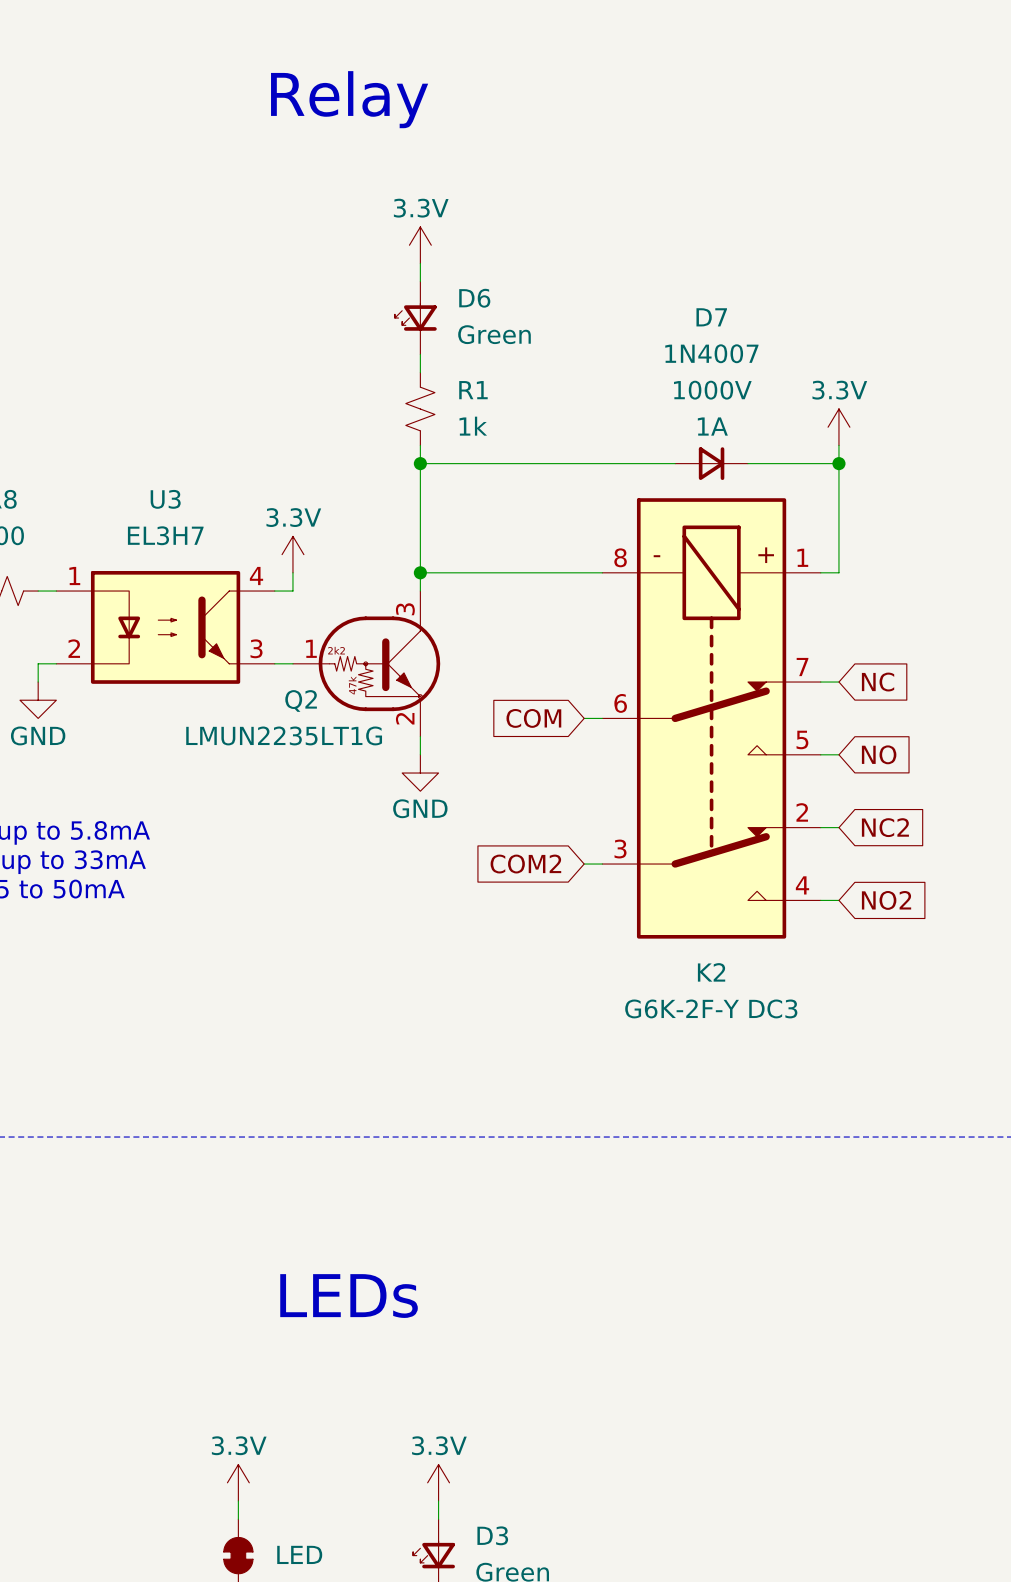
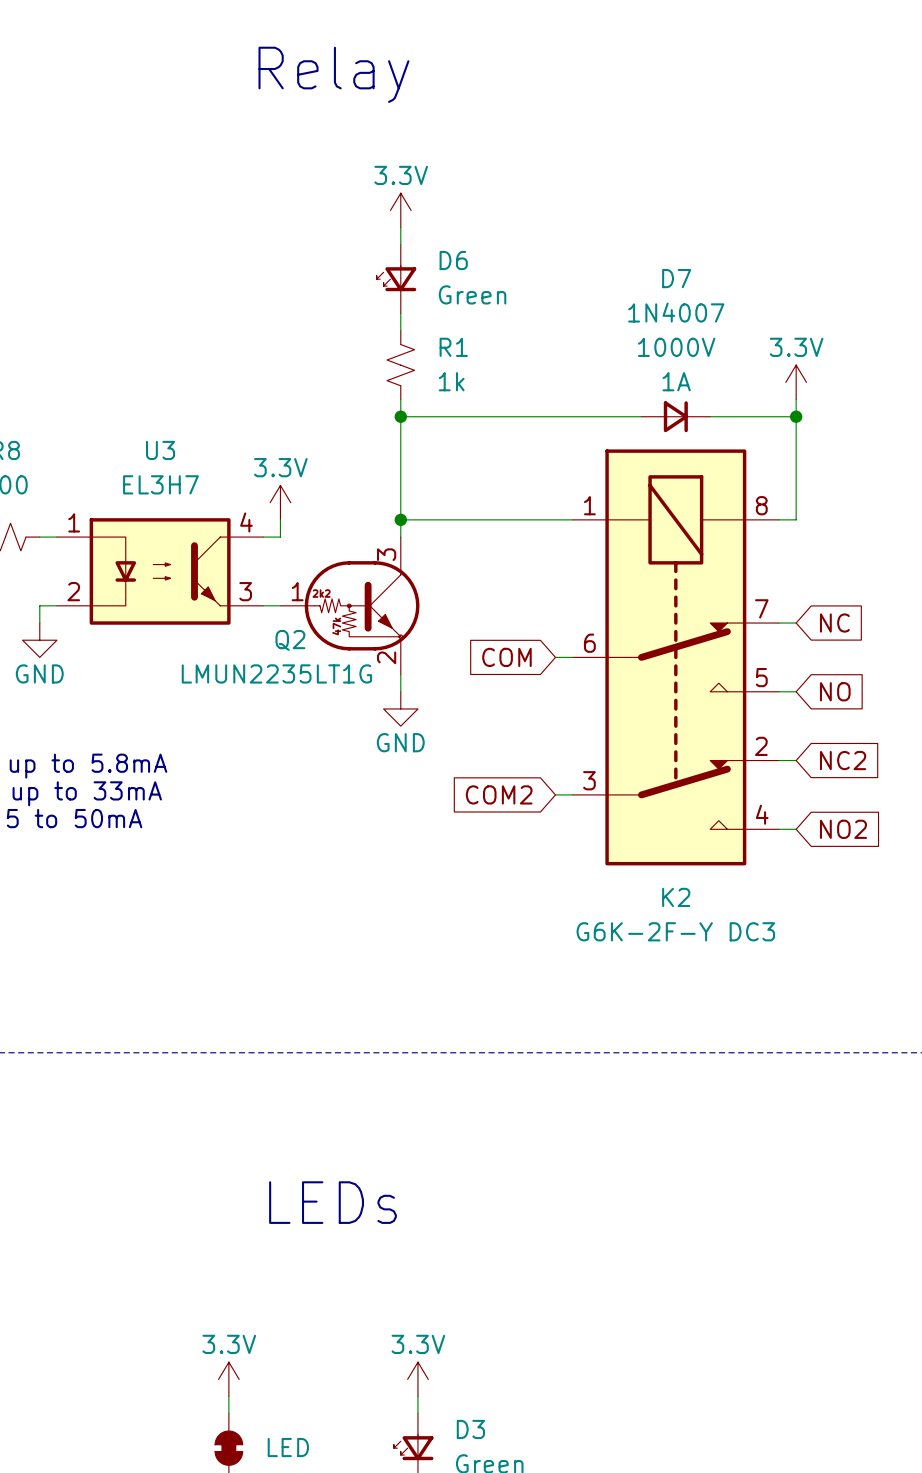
K2 text: + (766, 555) -> none
K2 text: - (656, 556) -> none
K2 pin number: 8 (620, 557) -> 1 (589, 505)
K2 pin number: 1 (802, 557) -> 8 (761, 505)

